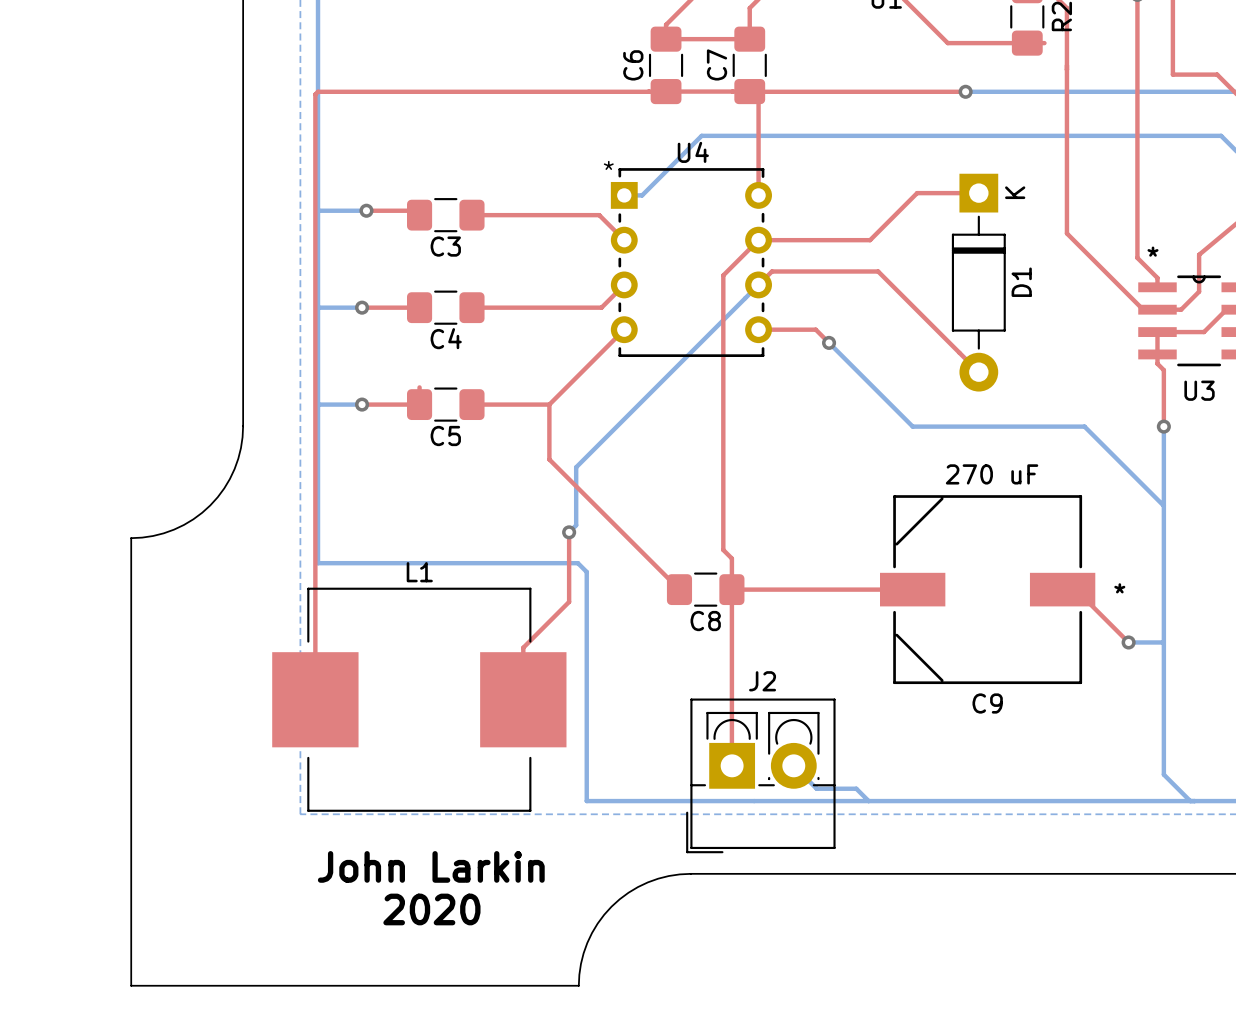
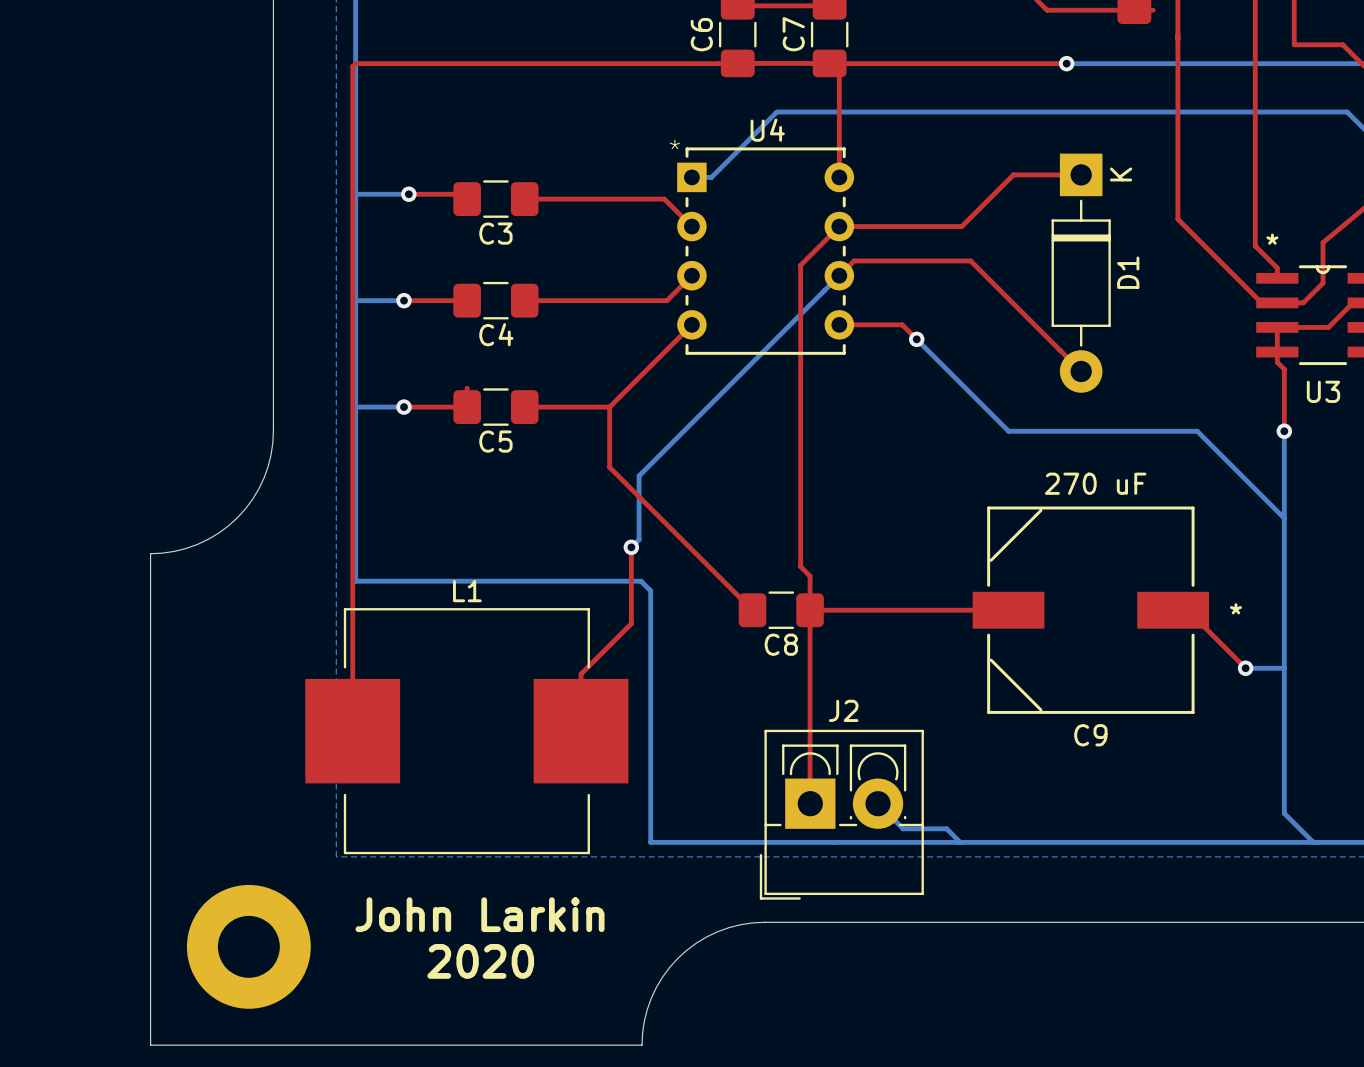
part: none -> (248, 946)

